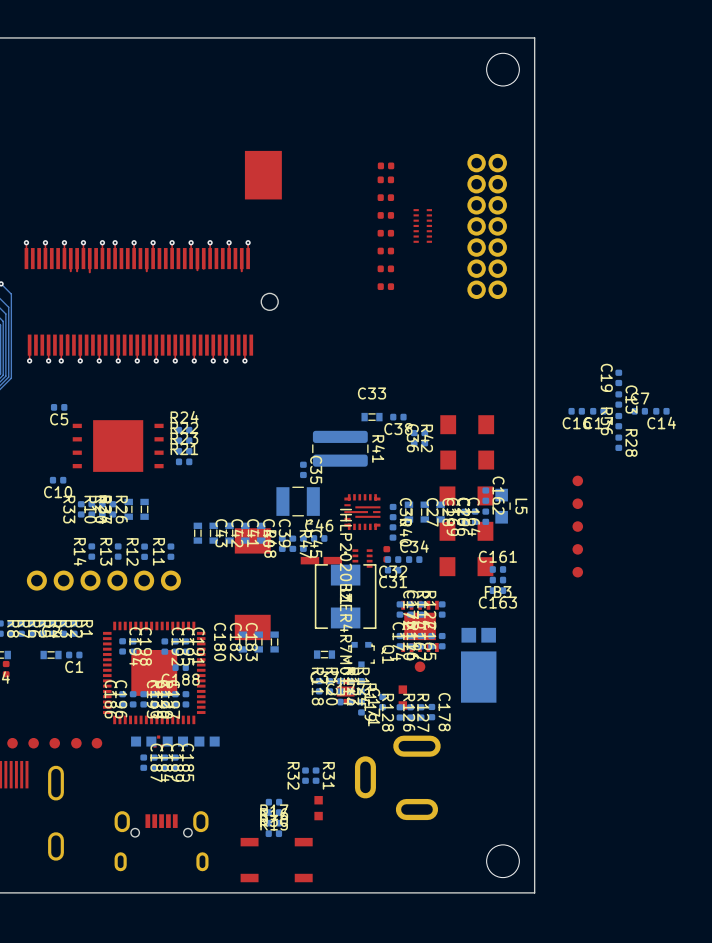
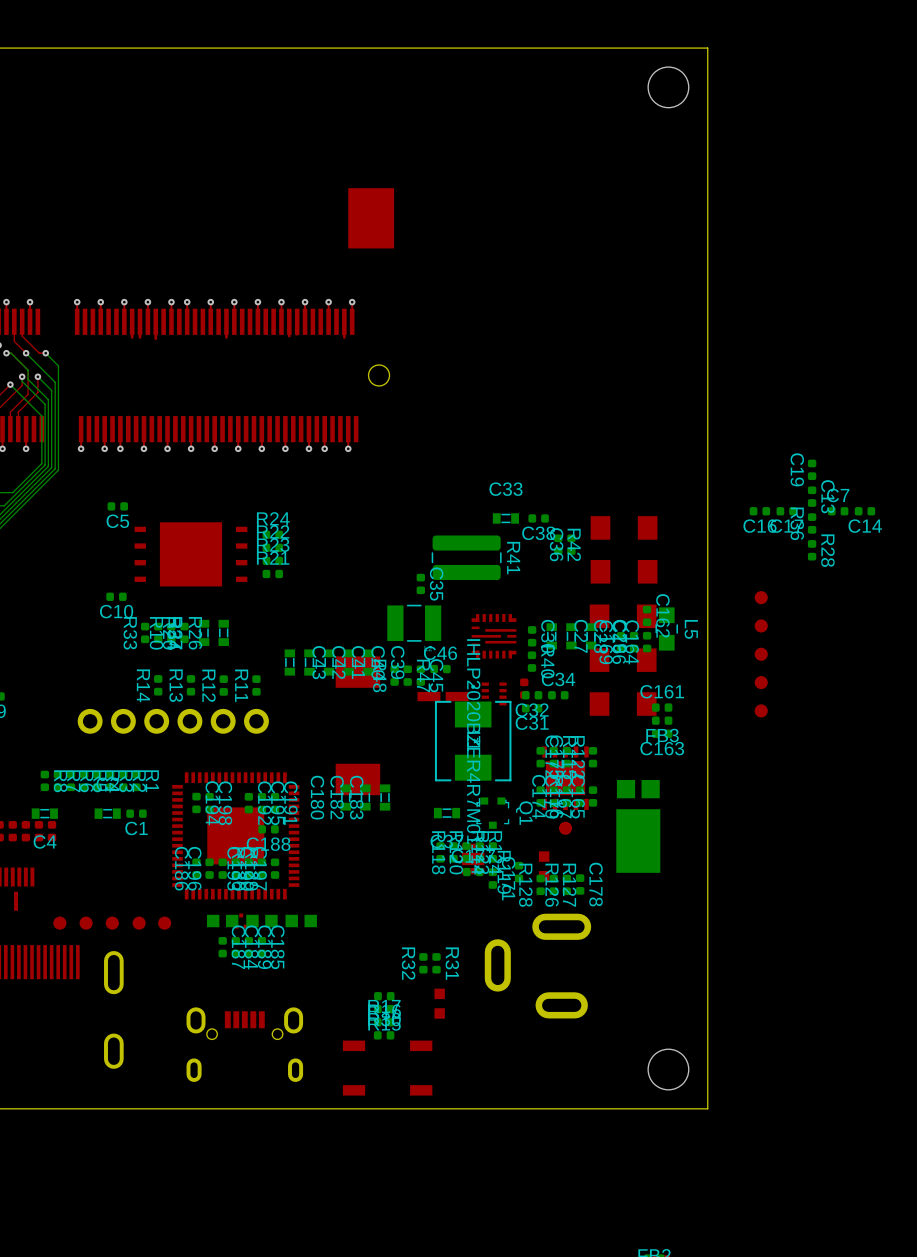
part: (386, 165) -> none
part: (385, 179) -> none
part: (385, 197) -> none
part: (385, 215) -> none
part: (422, 225) -> none
part: (487, 226) -> none
part: (385, 233) -> none
part: (385, 251) -> none
part: (385, 268) -> none
part: (385, 286) -> none

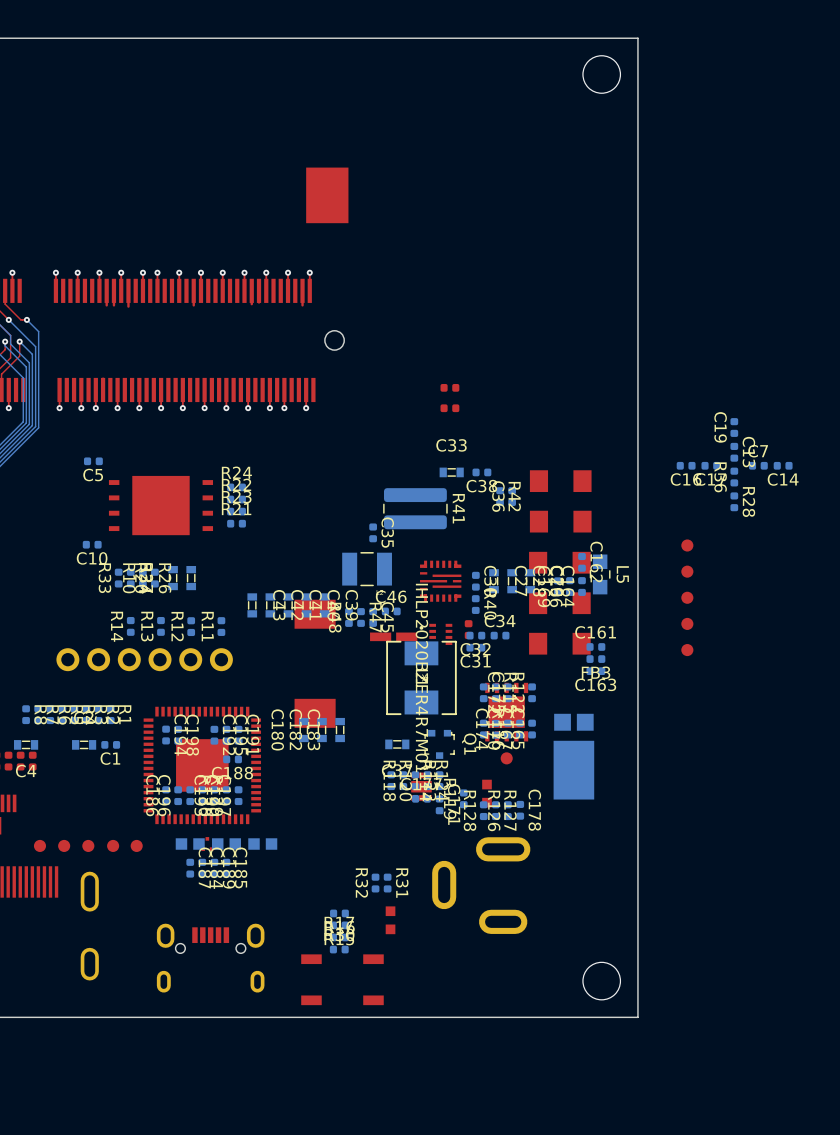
part: none -> (449, 387)
part: none -> (449, 408)

